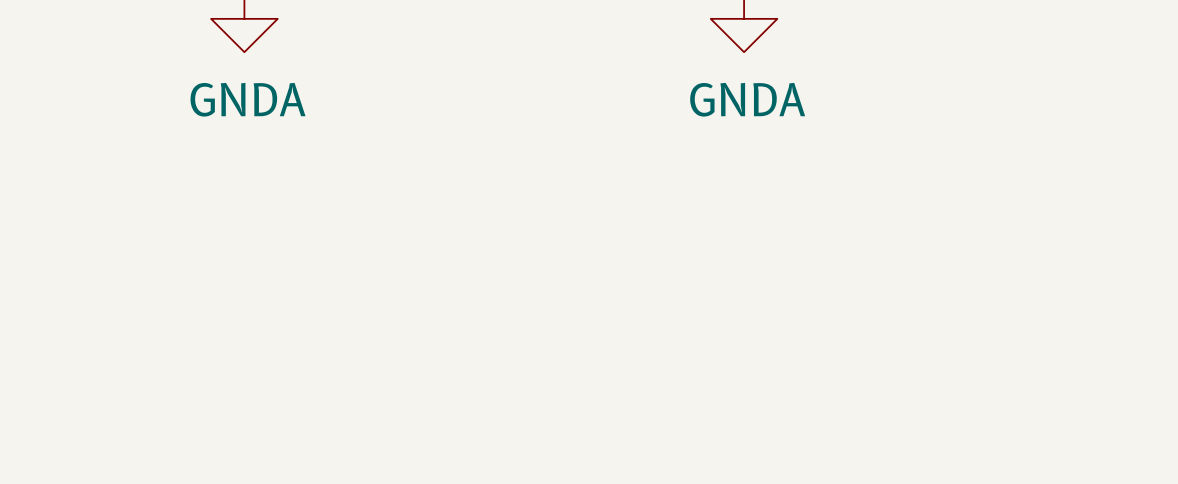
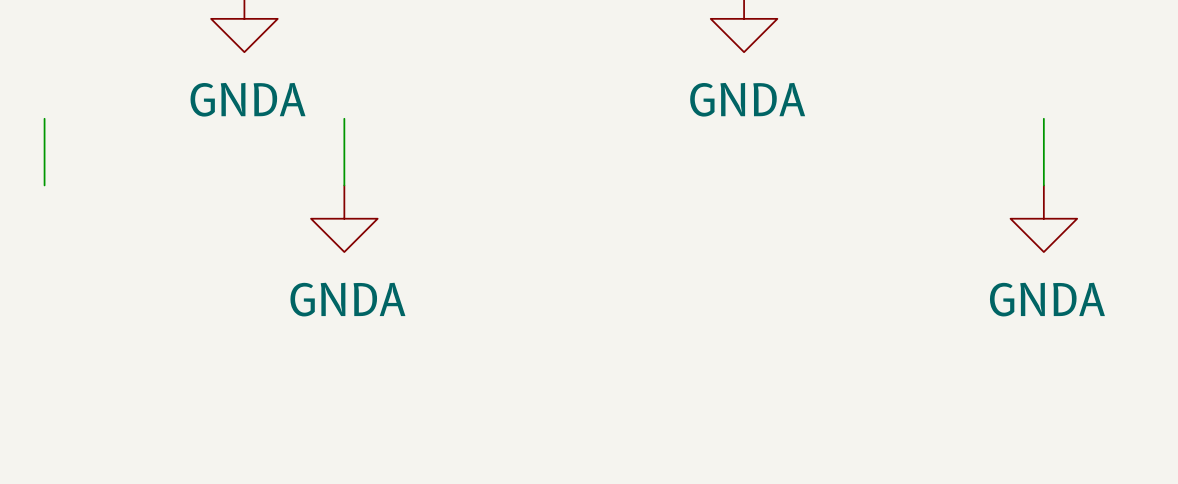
wire: none -> (44, 118) (44, 185)
wire: none -> (344, 118) (344, 185)
wire: none -> (1043, 118) (1043, 185)
power symbol: none -> GNDA (344, 218)
power symbol: none -> GNDA (1043, 218)

